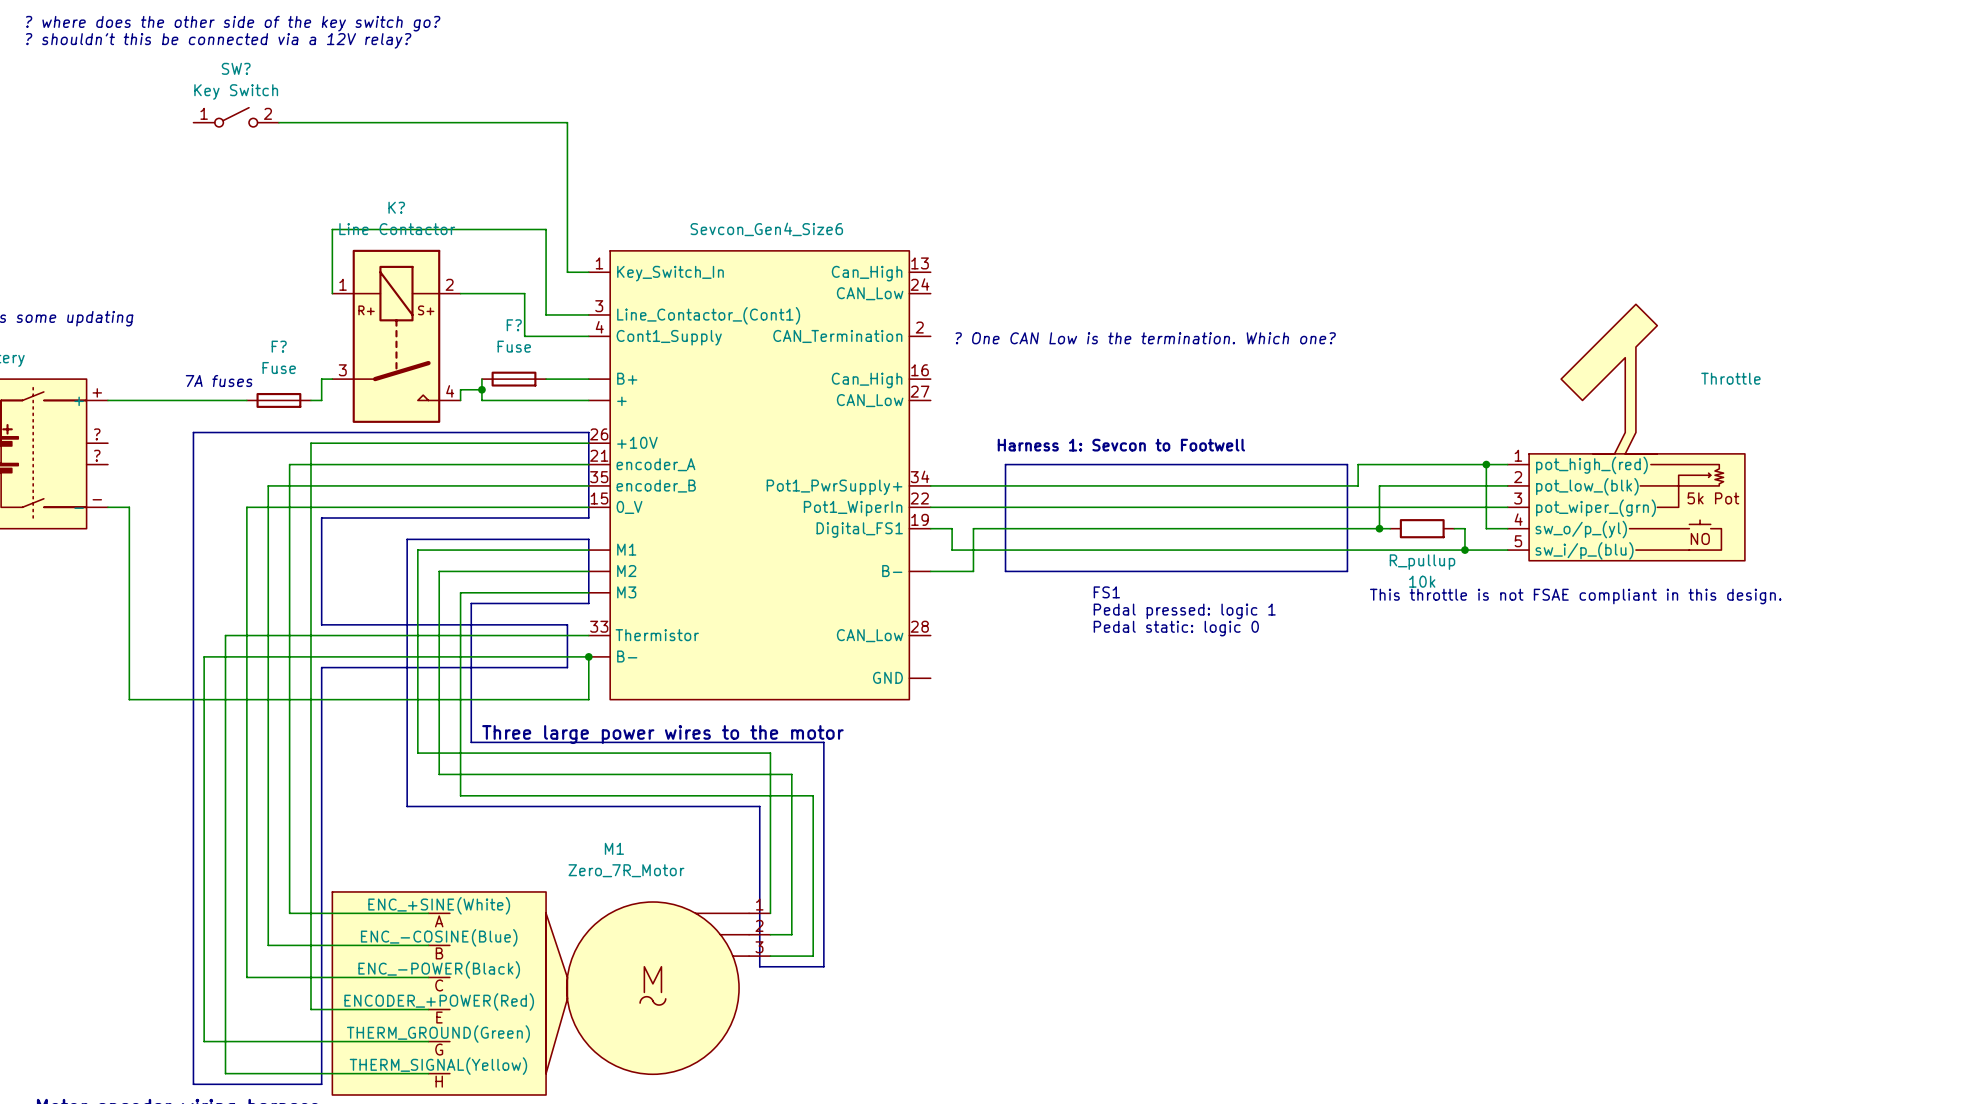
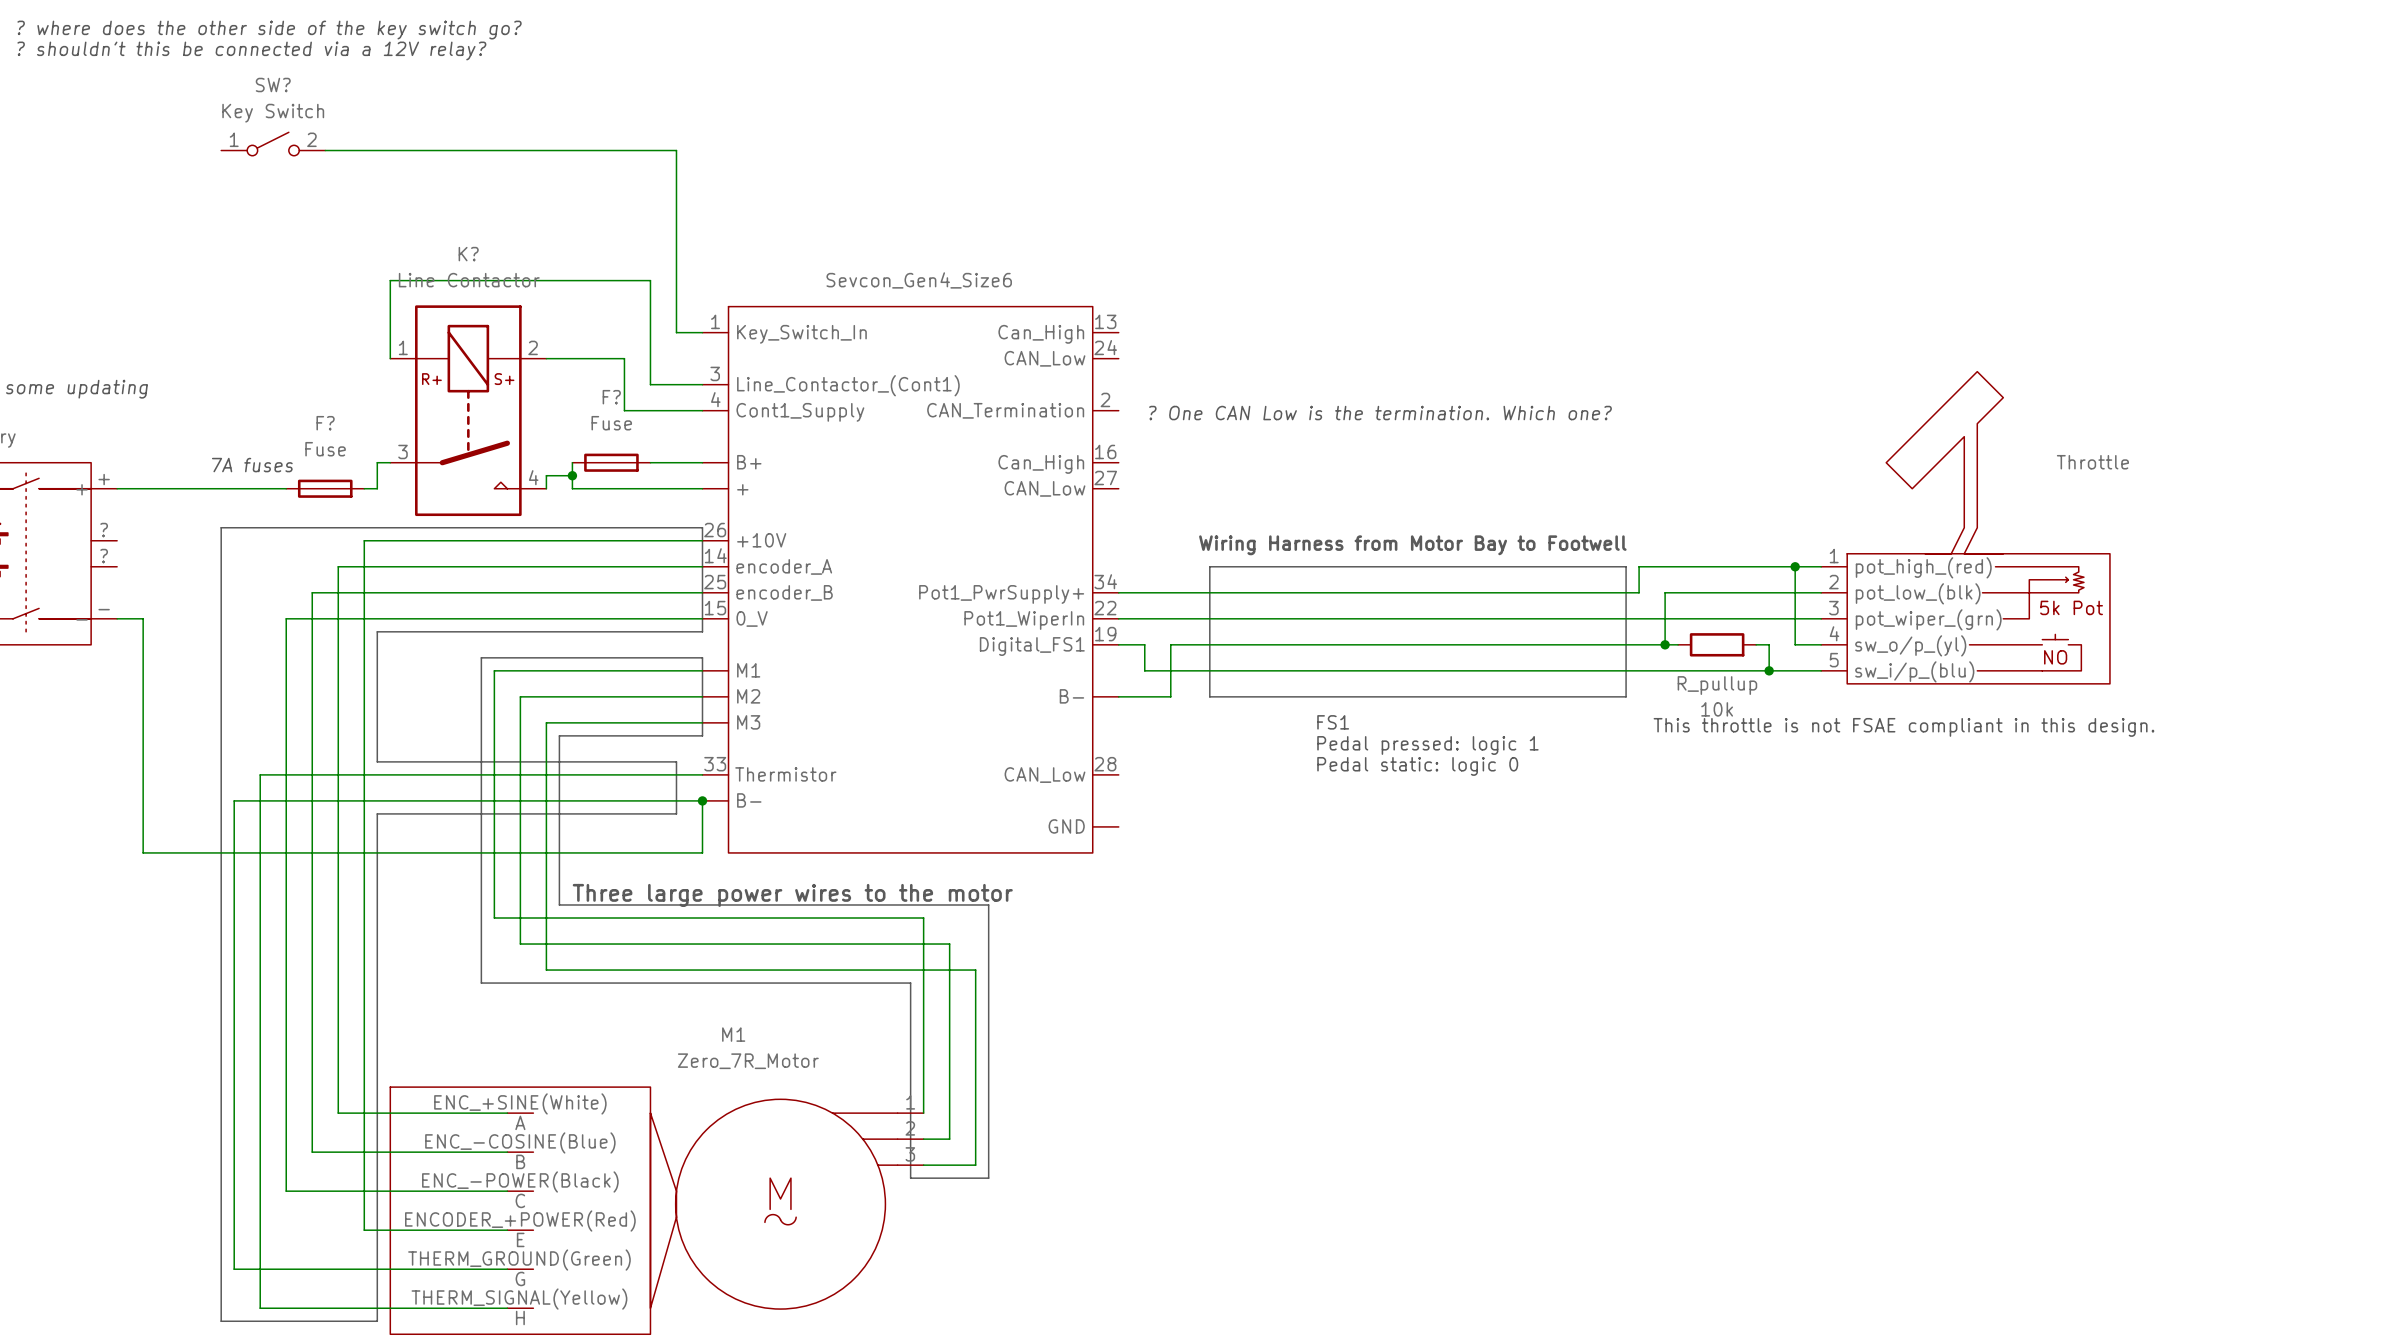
text: Harness 1: Sevcon to Footwell (1121, 445) -> Wiring Harness from Motor Bay to Footwell (1412, 545)
part pin number: 21 (599, 455) -> 14 (715, 555)
part pin number: 35 (599, 477) -> 25 (715, 582)

